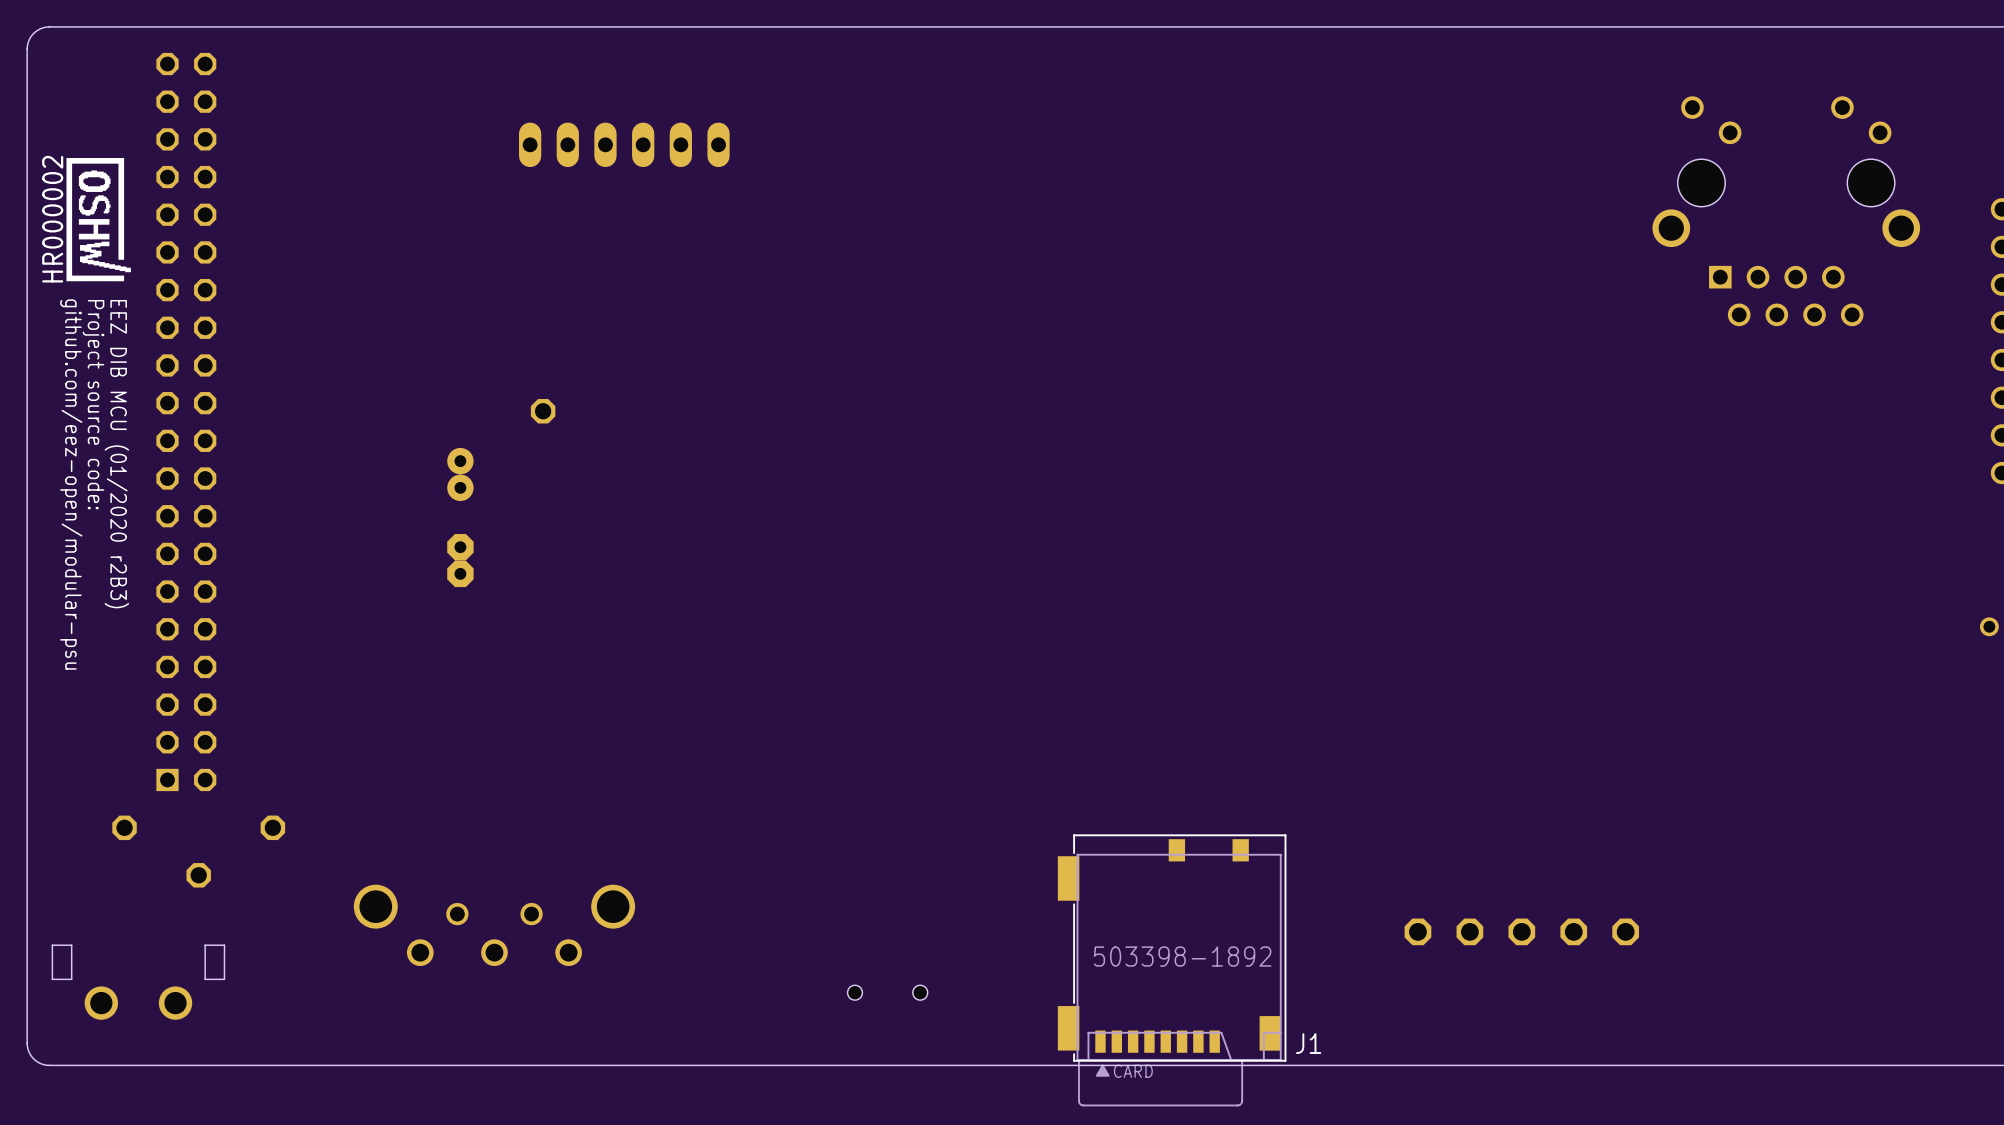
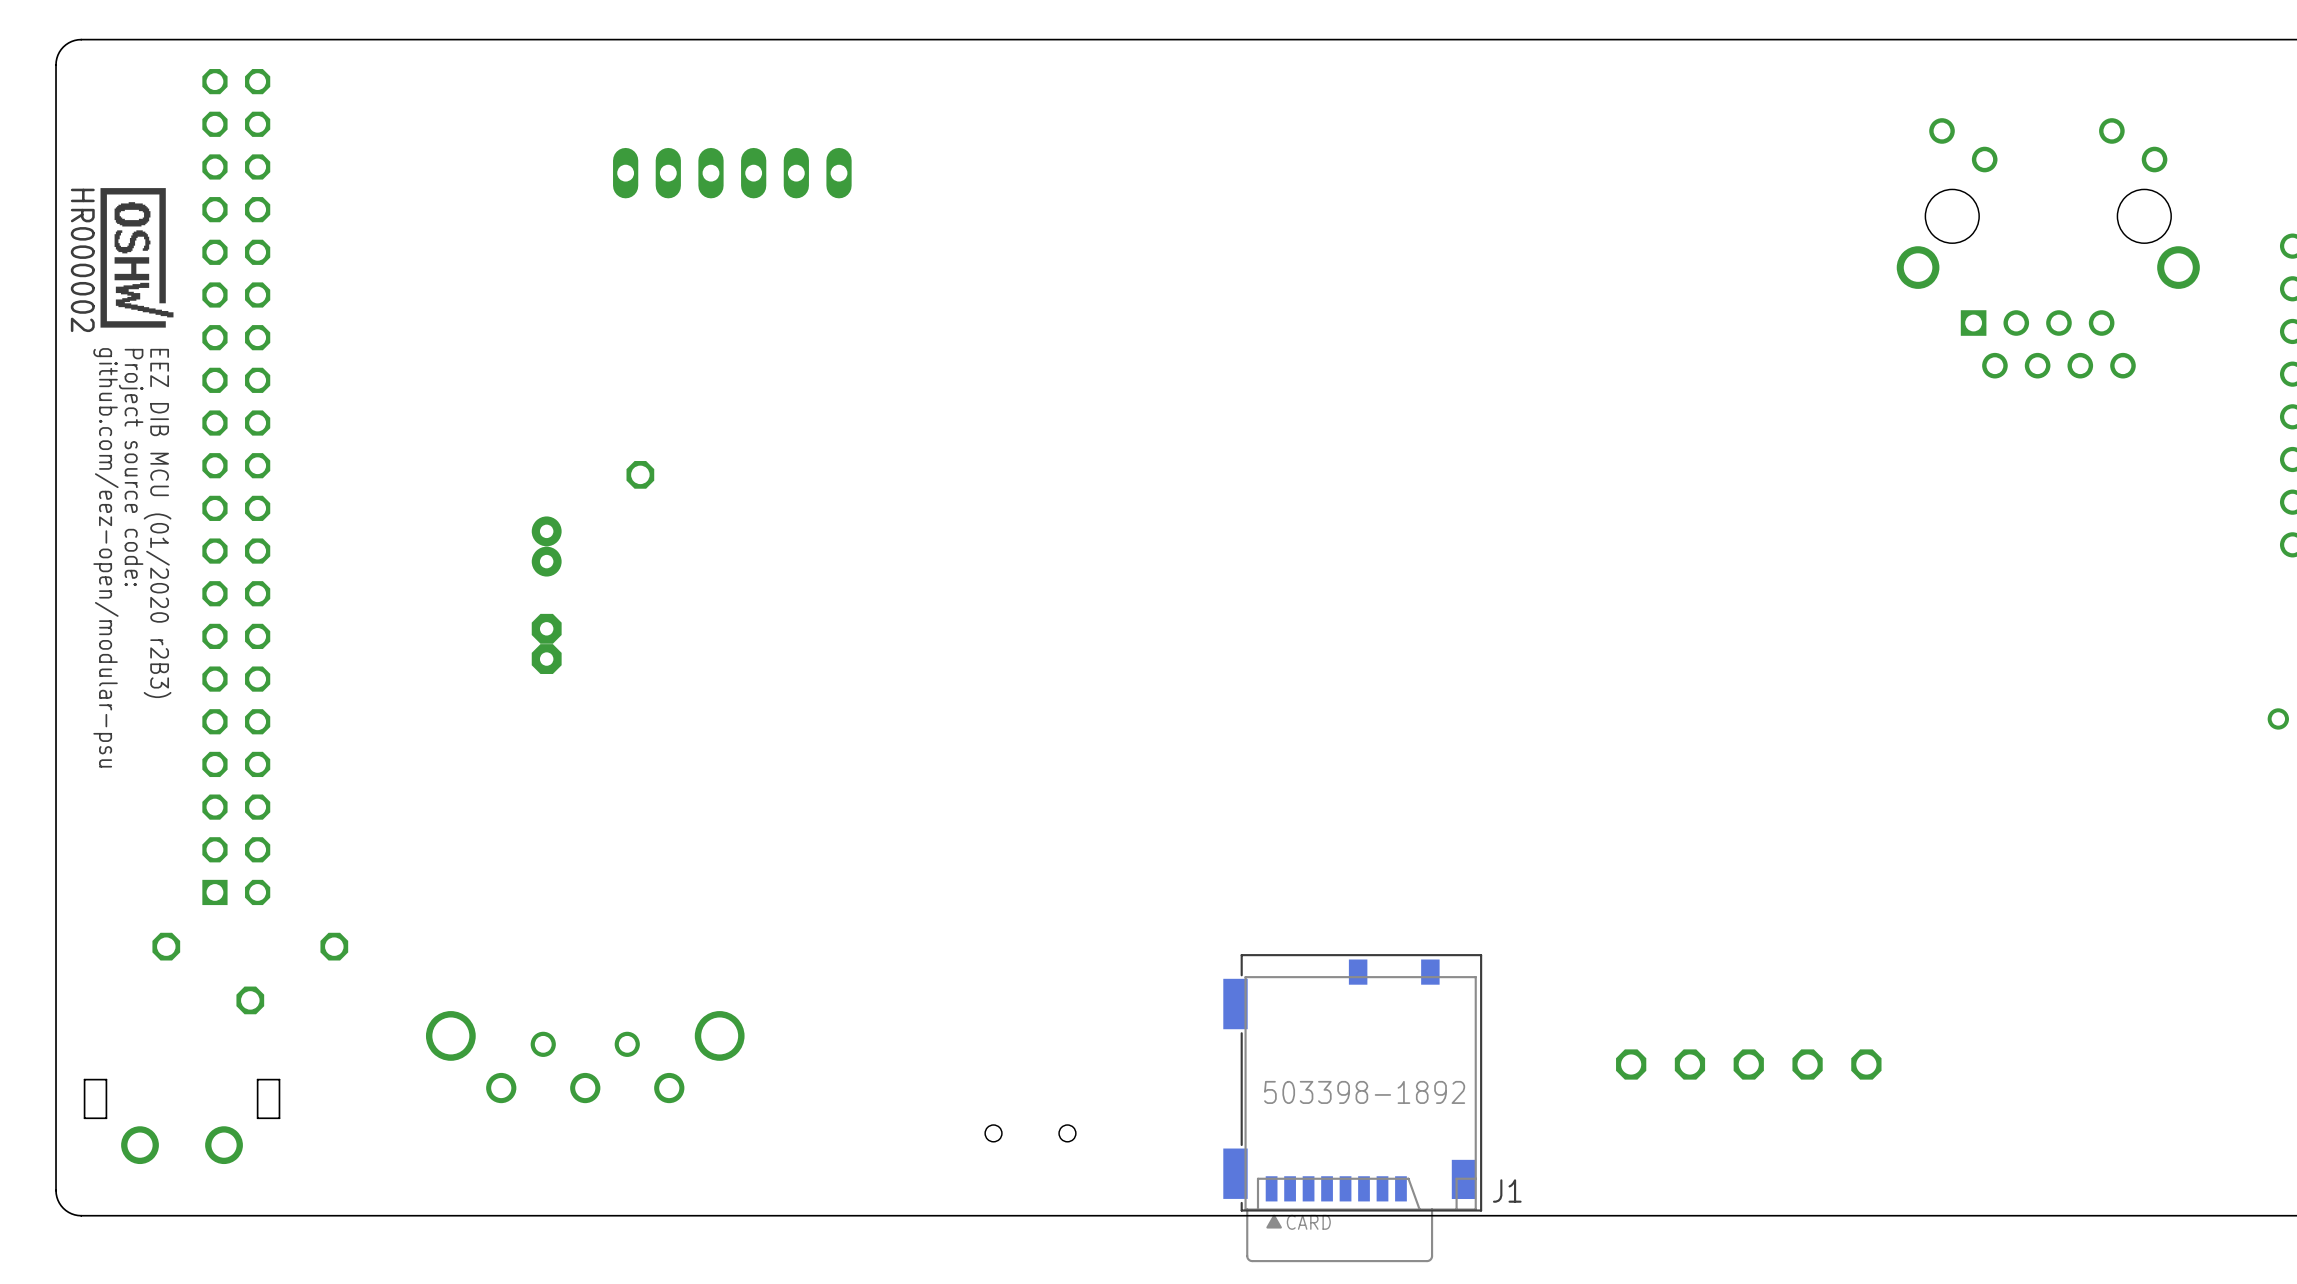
drawing shape: [42, 155, 131, 283] -> [70, 188, 174, 333]

